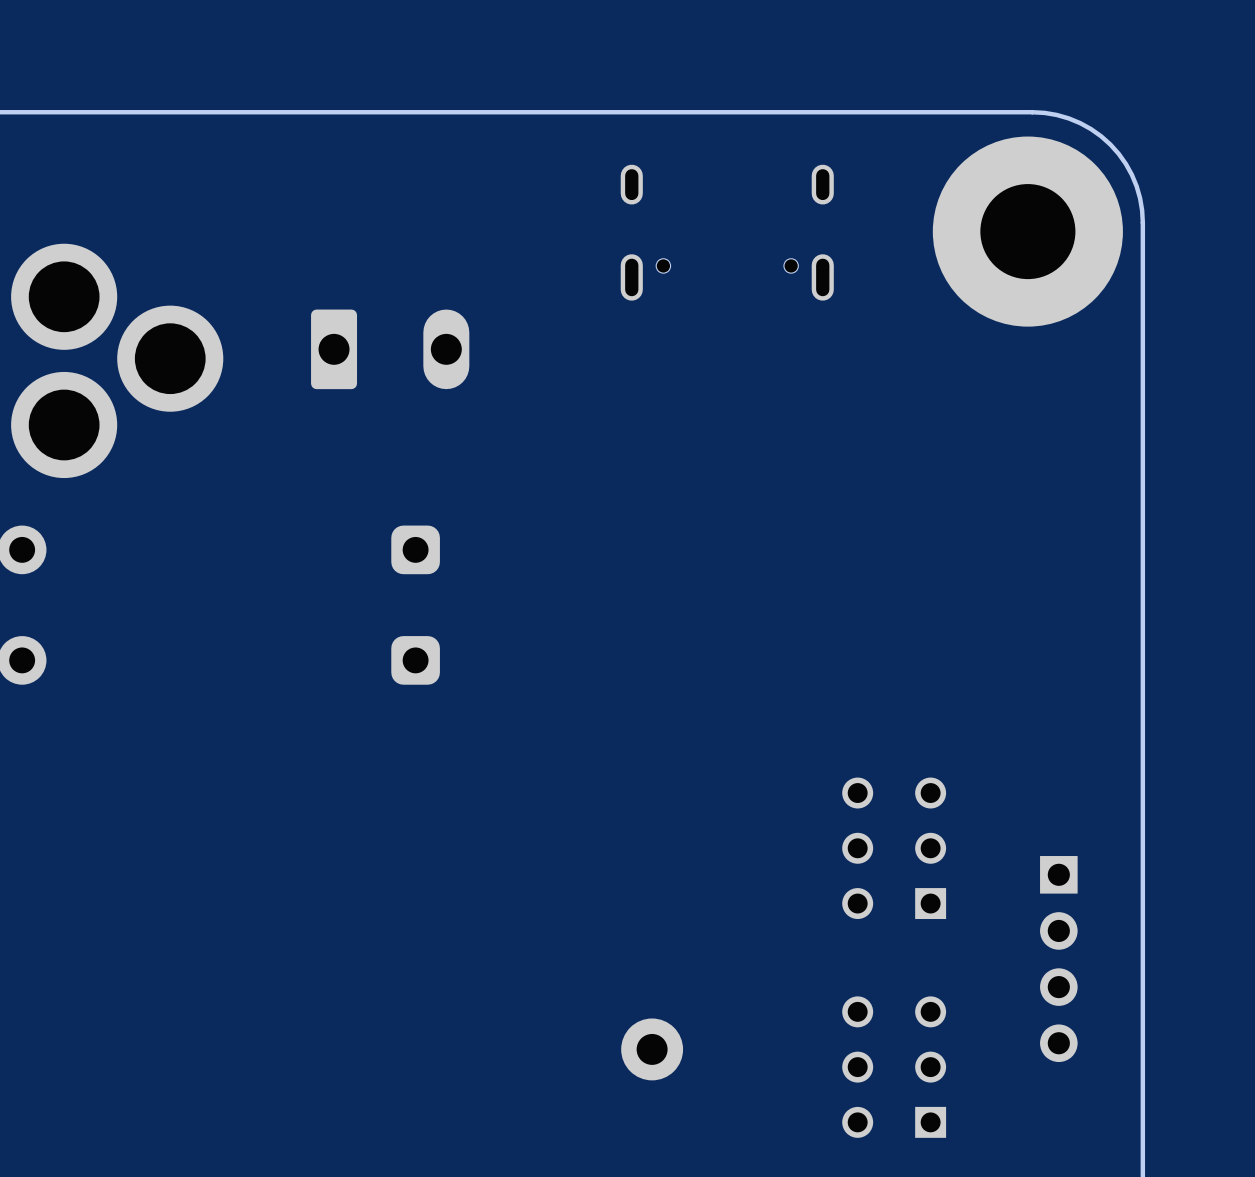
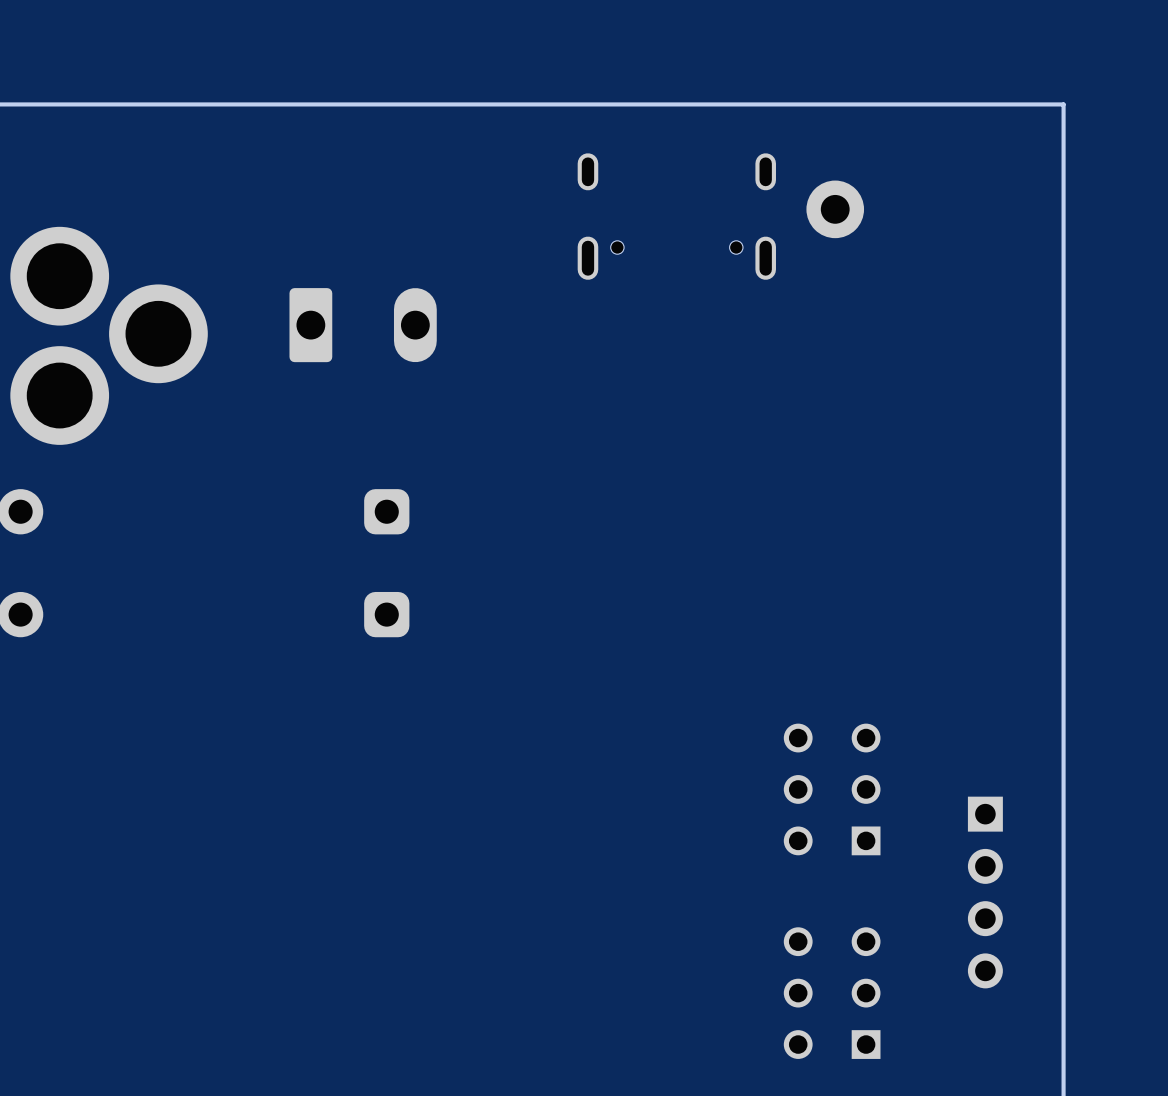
board edge: (1032, 112) (1068, 118) (1091, 129) (1110, 144) (1125, 163) (1136, 186) (1142, 222) -> (960, 104) (1063, 104) (1063, 207)
part: none -> (835, 209)
part: (1027, 231) -> none
part: (652, 1049) -> none

